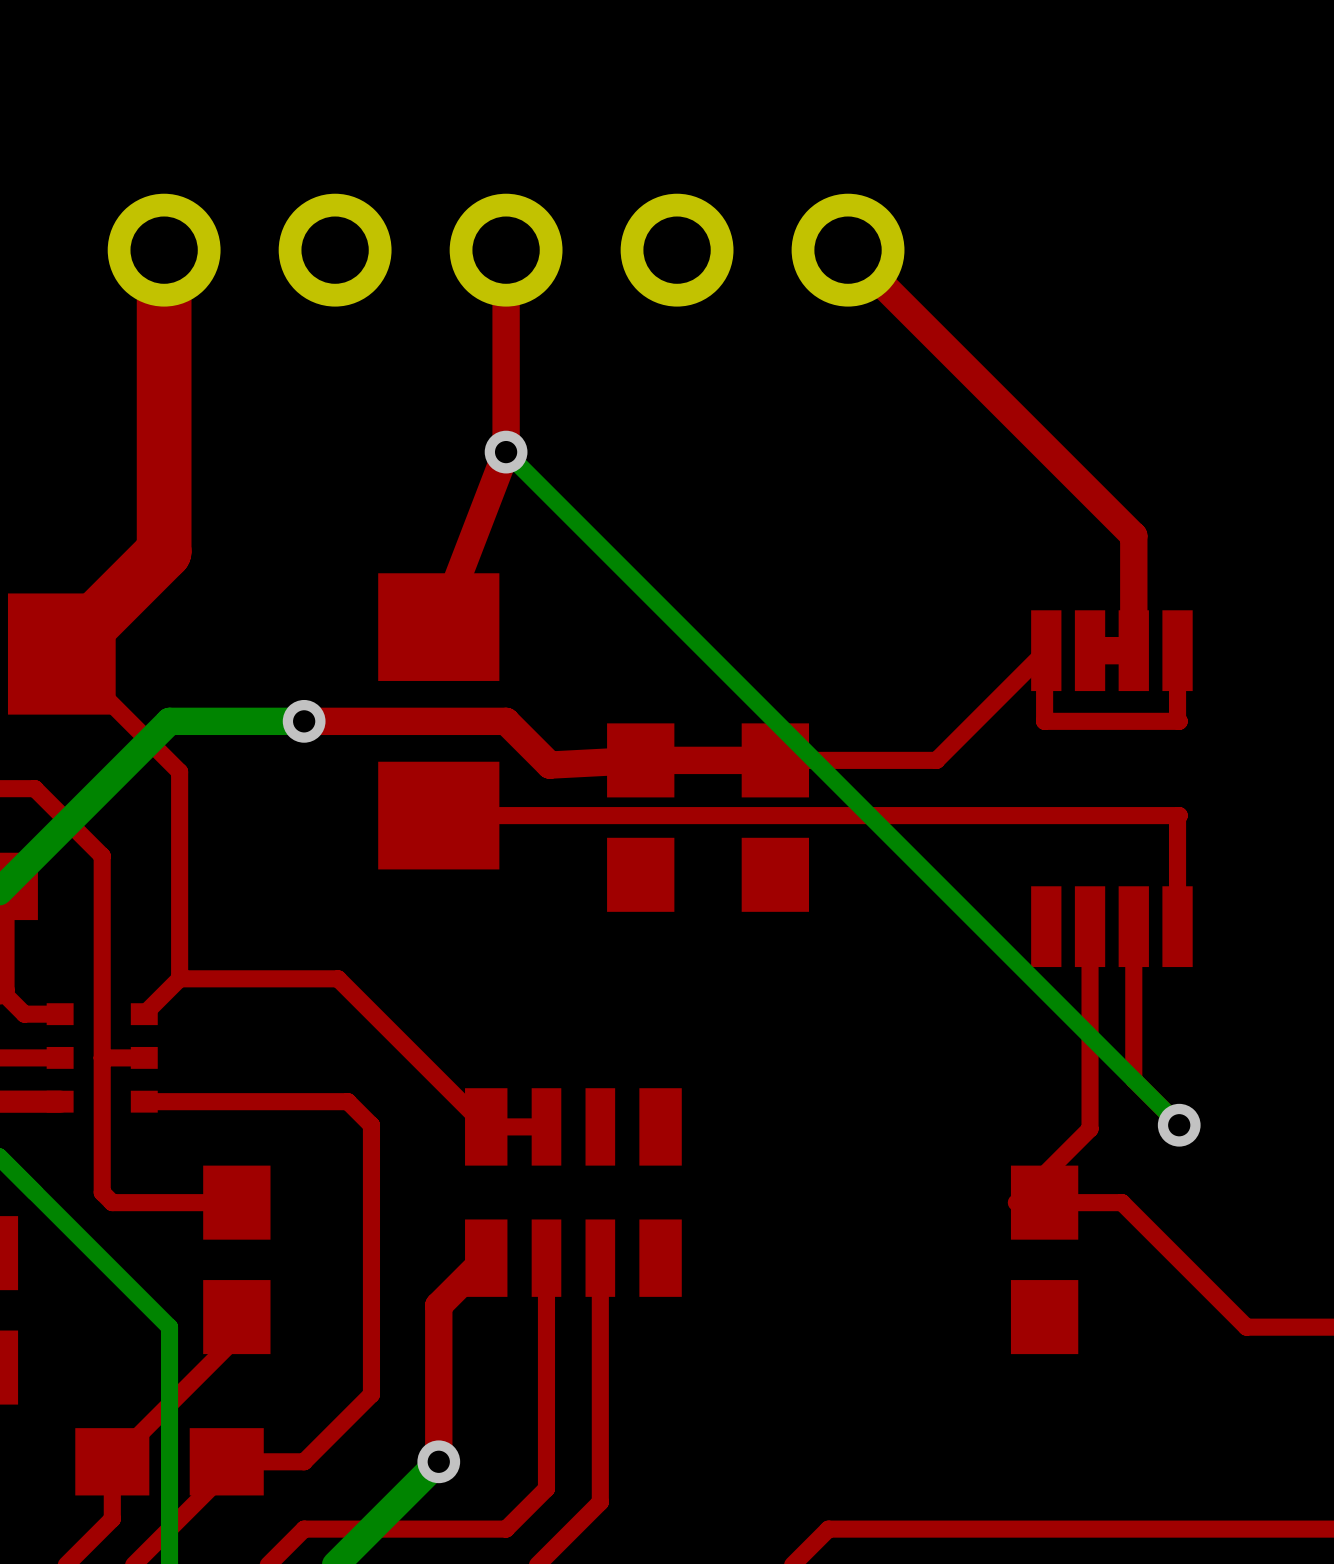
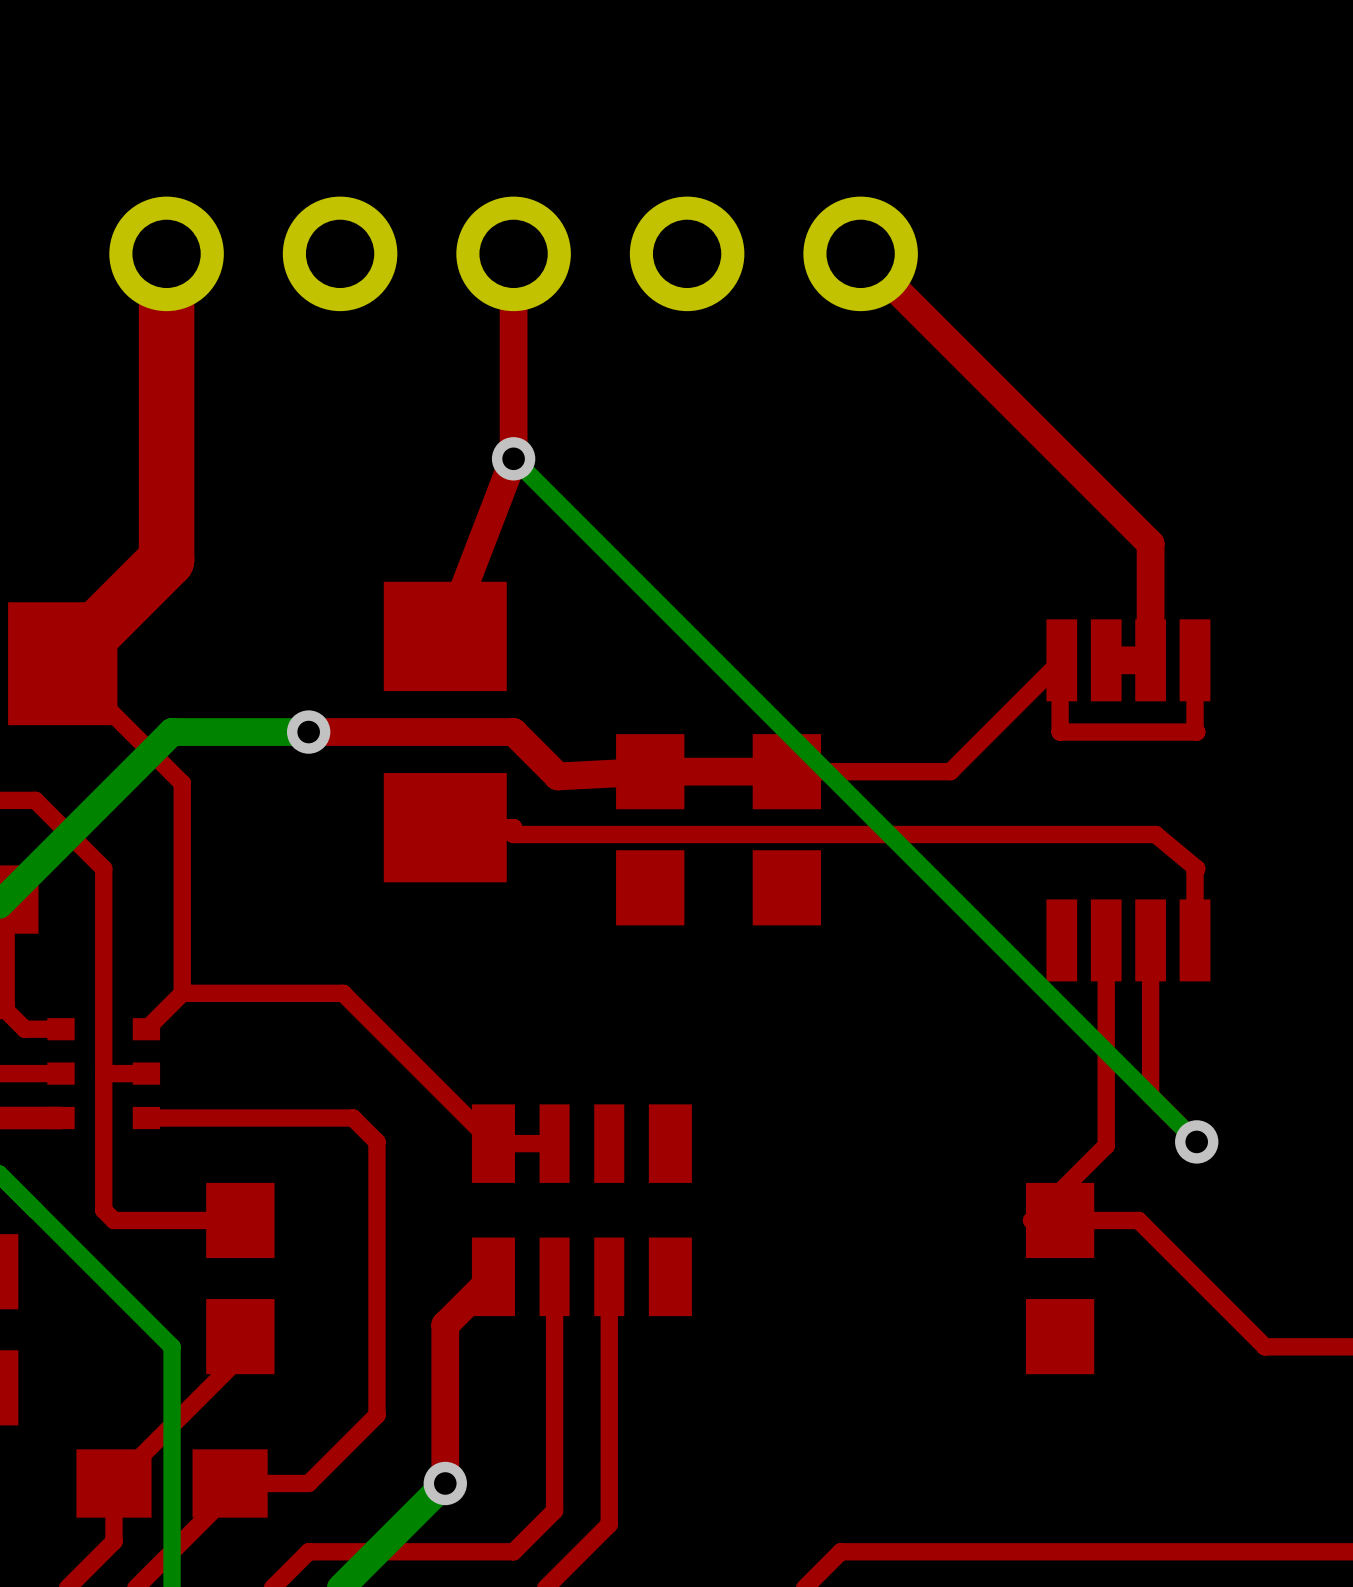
top track: (506, 815) (1179, 815) (1177, 817) (1177, 857) -> (513, 827) (513, 834) (1155, 834) (1196, 868) (1195, 870)

